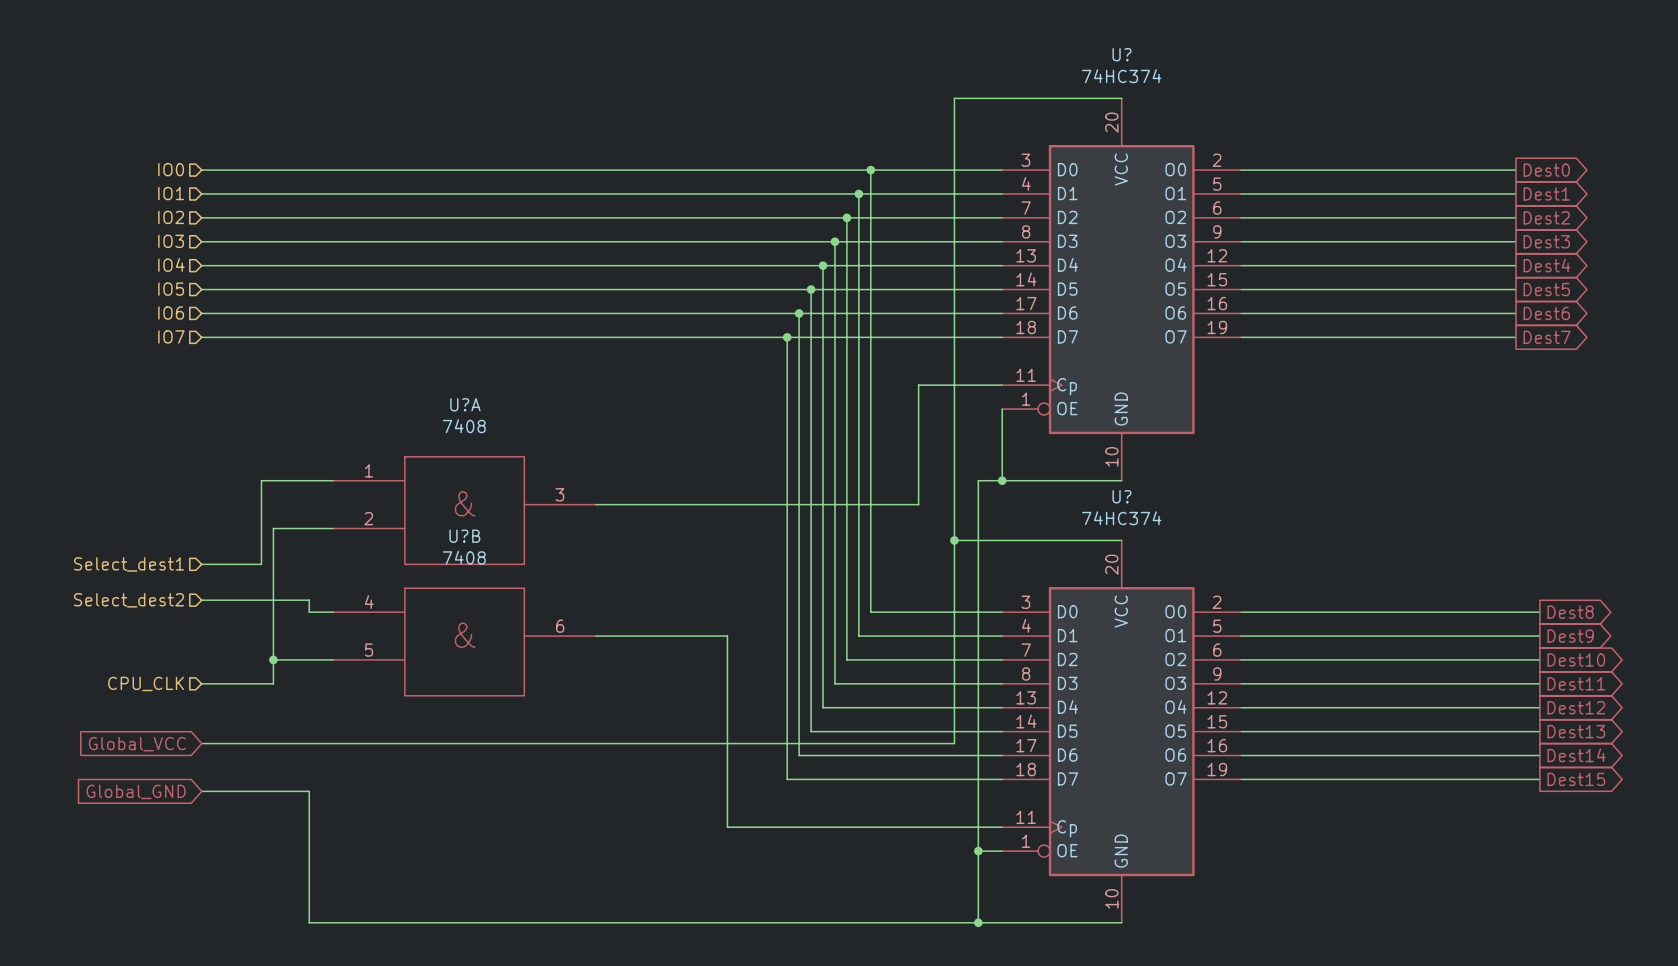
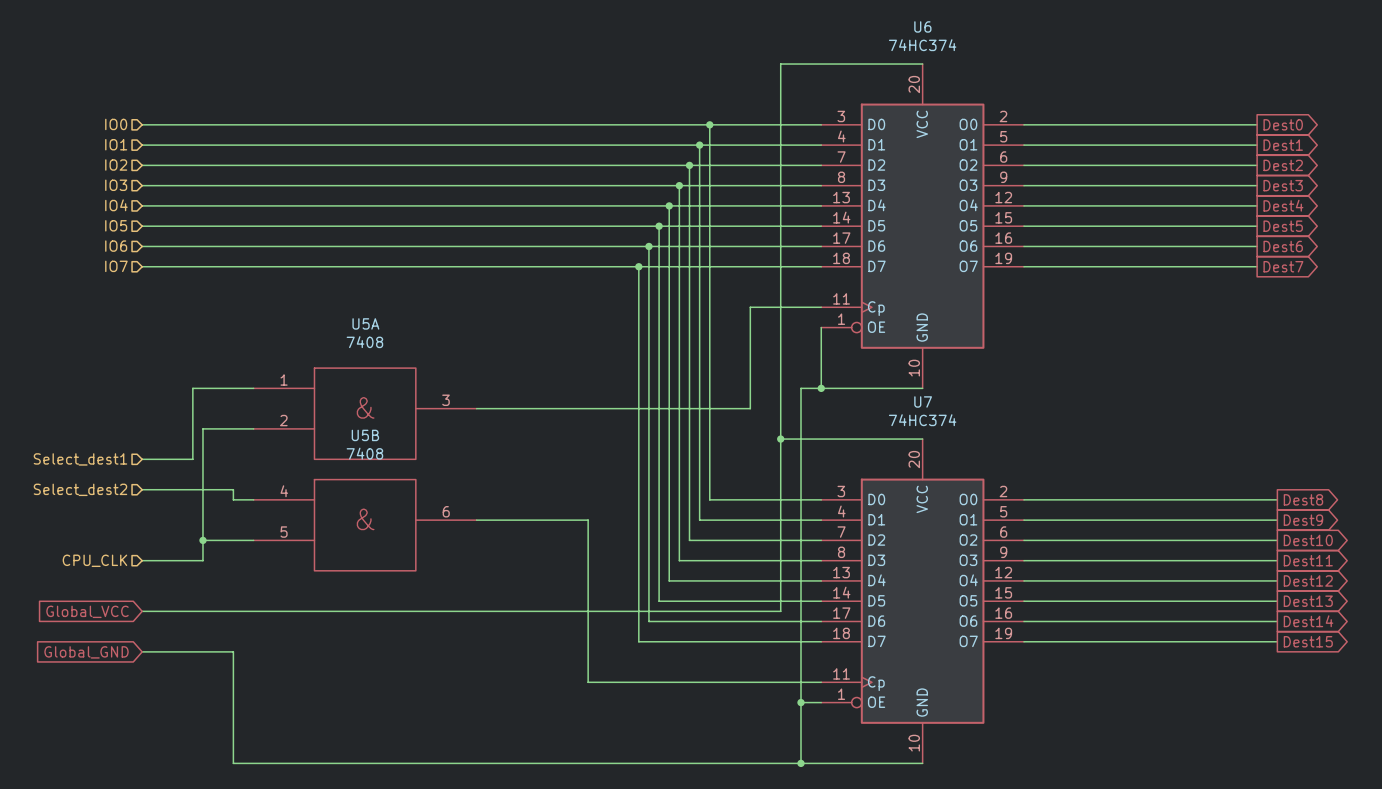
U? name: U? (1122, 54) -> U6 (922, 26)
U?A name: U?A (465, 404) -> U5A (365, 323)
U? name: U? (1122, 496) -> U7 (923, 401)
U?B name: U?B (464, 536) -> U5B (365, 435)

